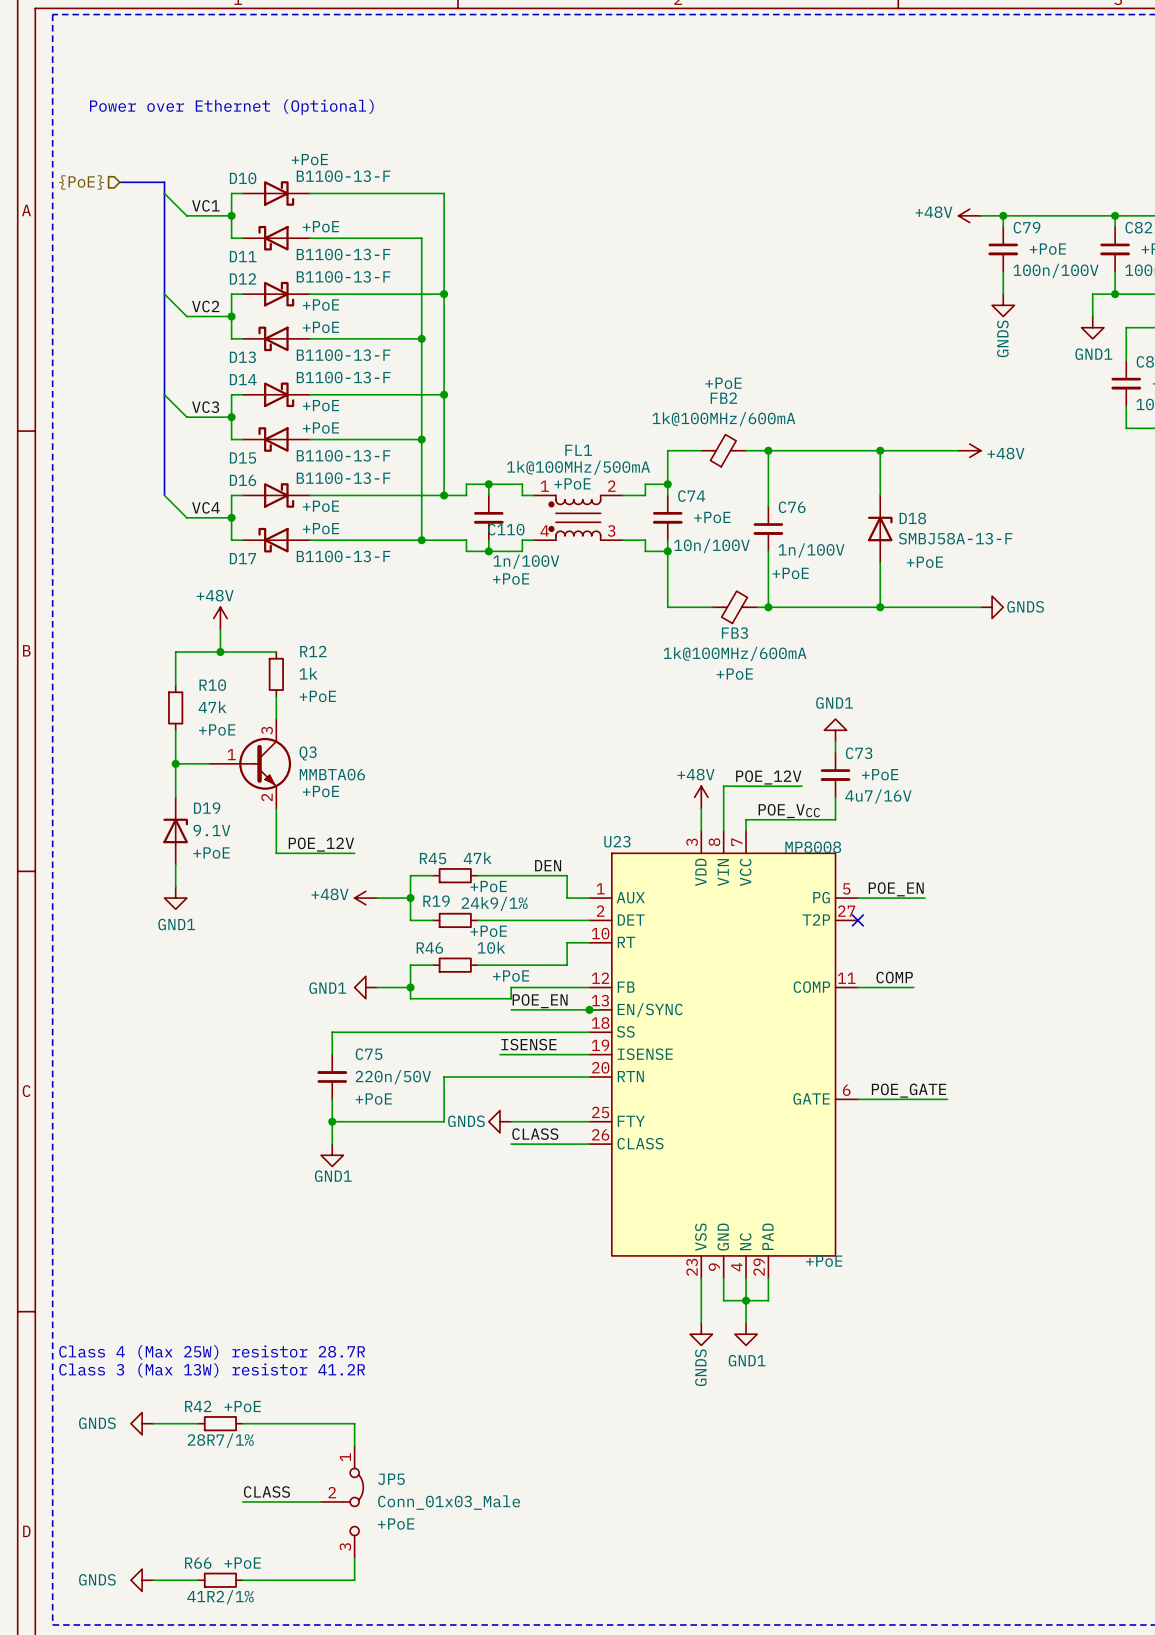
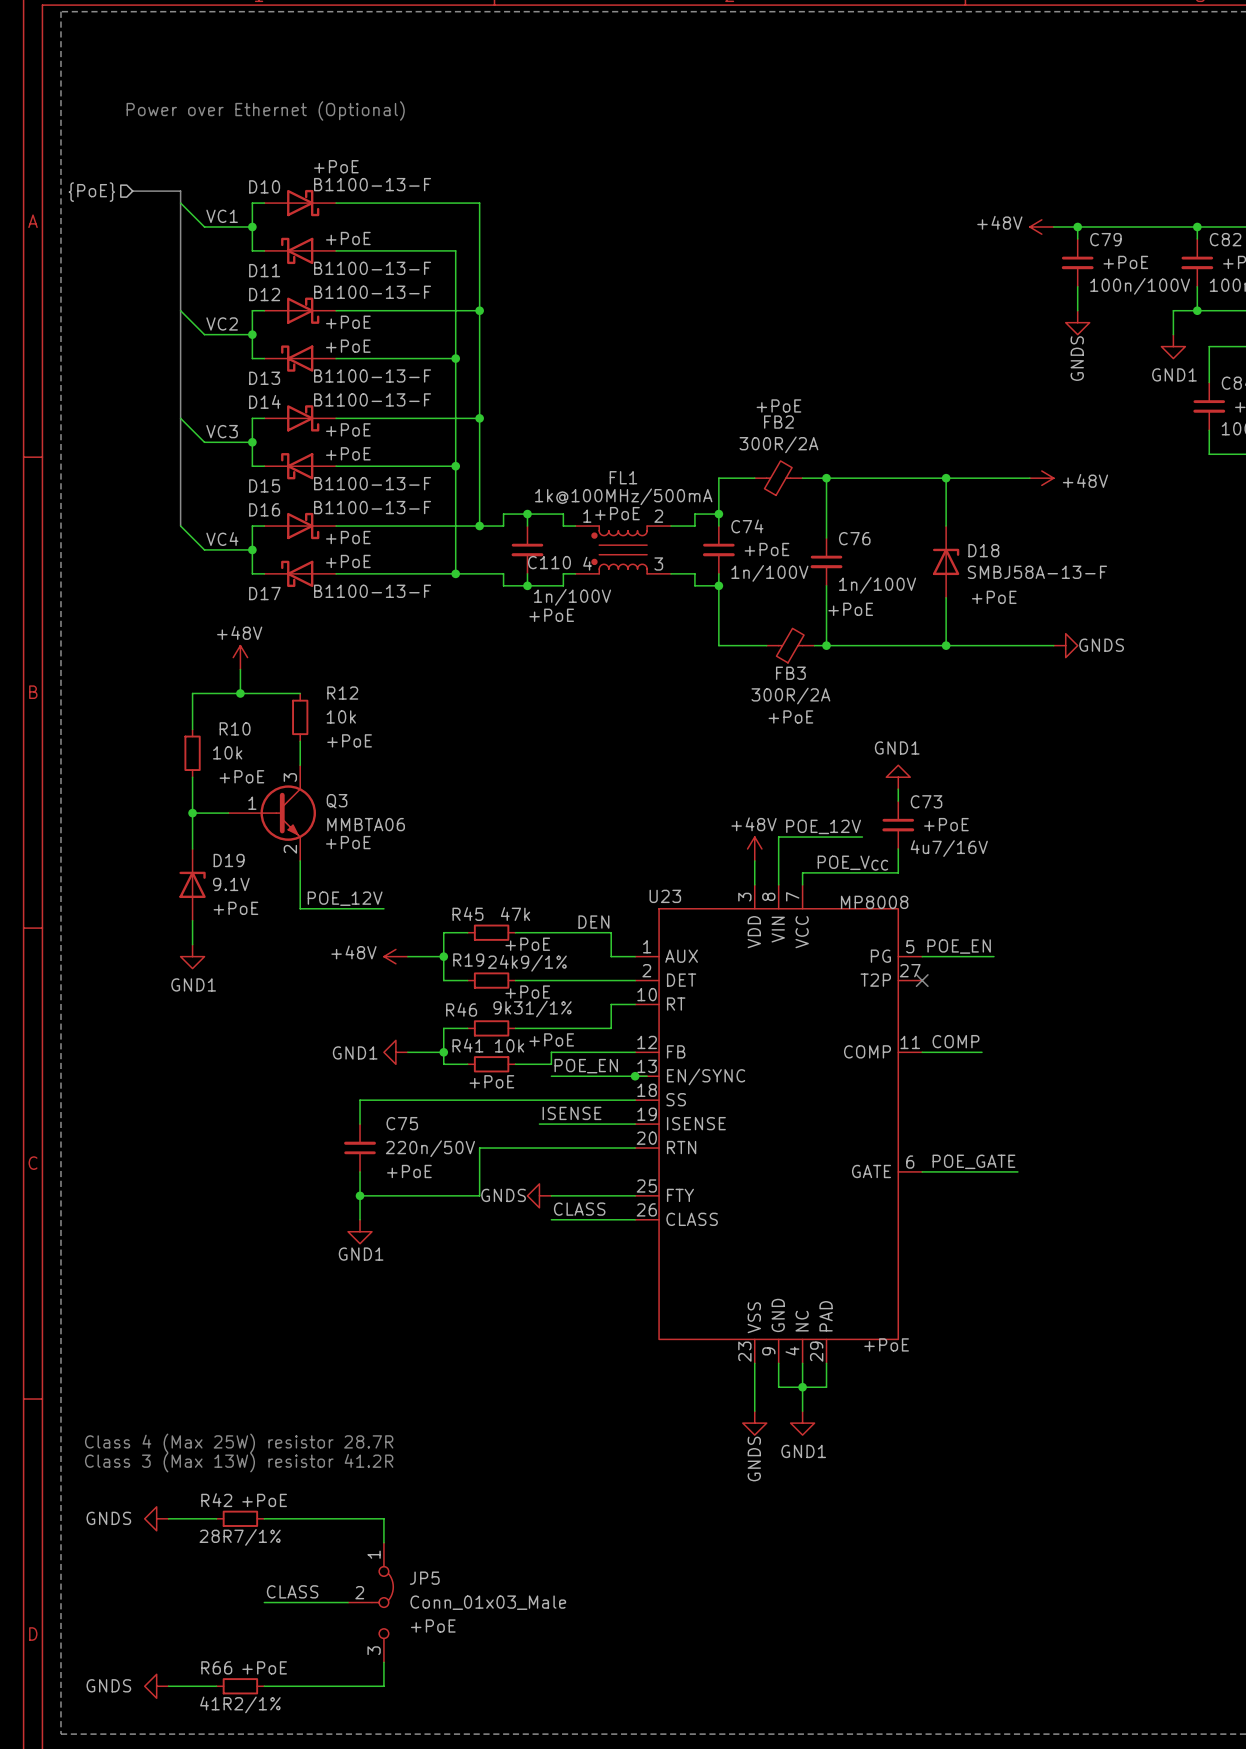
FB2 value: 1k@100MHz/600mA (723, 419) -> 300R/2A (778, 444)
C74 value: 10n/100V (711, 545) -> 1n/100V (769, 573)
FB3 value: 1k@100MHz/600mA (735, 653) -> 300R/2A (790, 696)
R12 value: 1k (308, 673) -> 10k (341, 716)
R10 value: 47k (212, 707) -> 10k (227, 752)
R46 value: 10k (491, 947) -> 9k31/1% (532, 1008)
wire: (432, 998) (477, 998) -> none
R41: none -> 10k (491, 1064)

